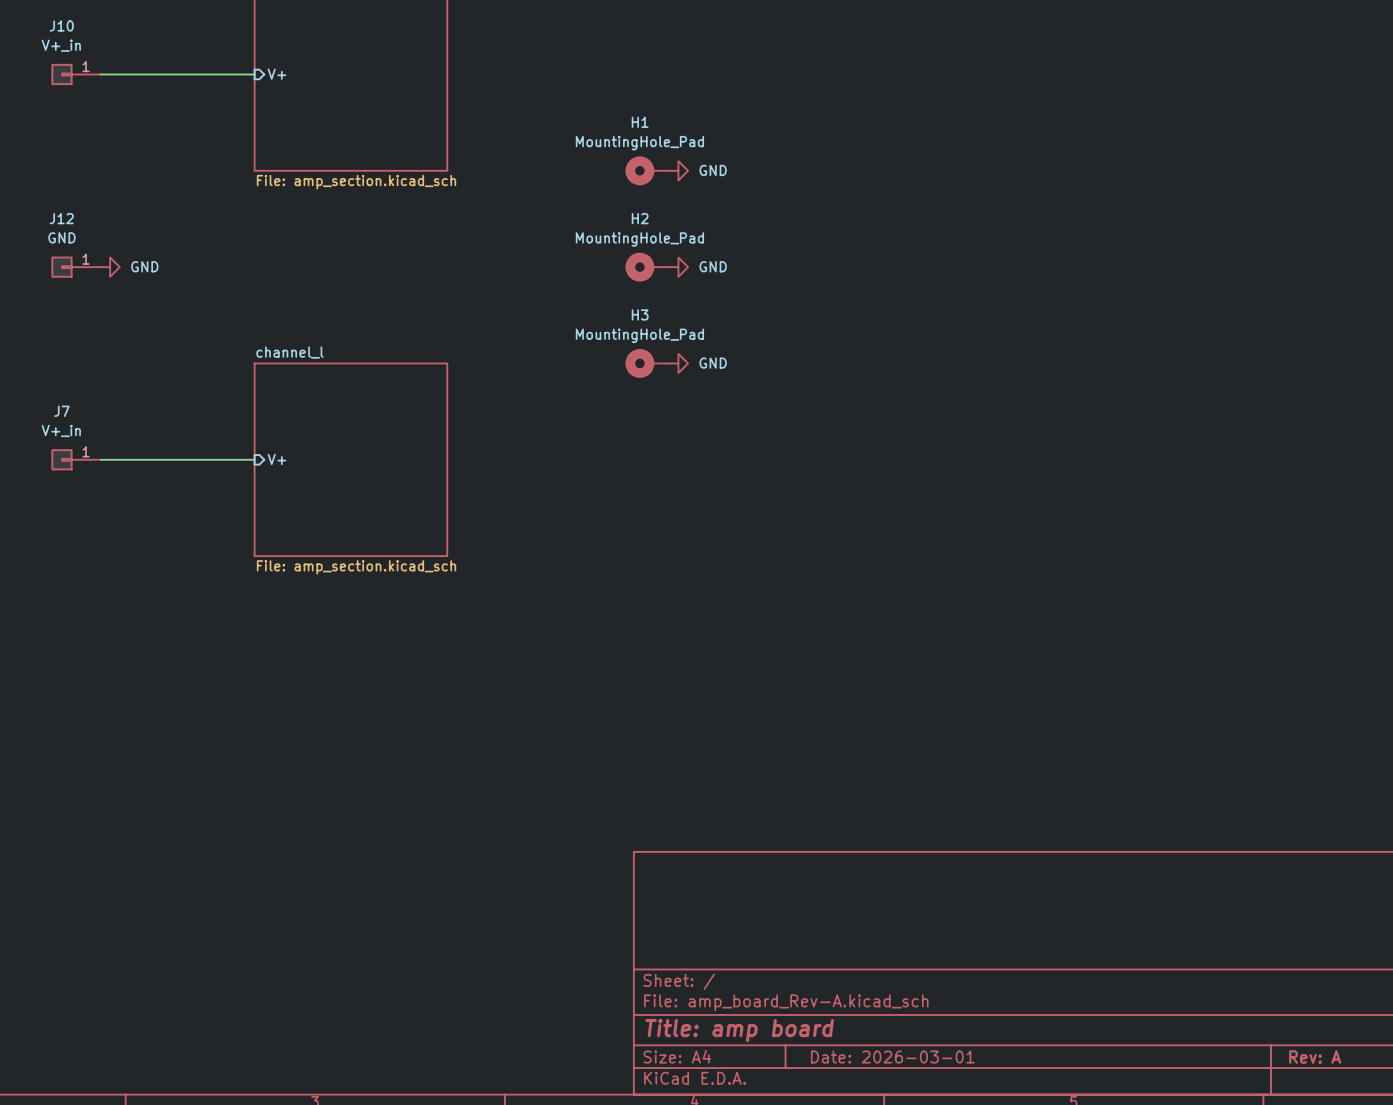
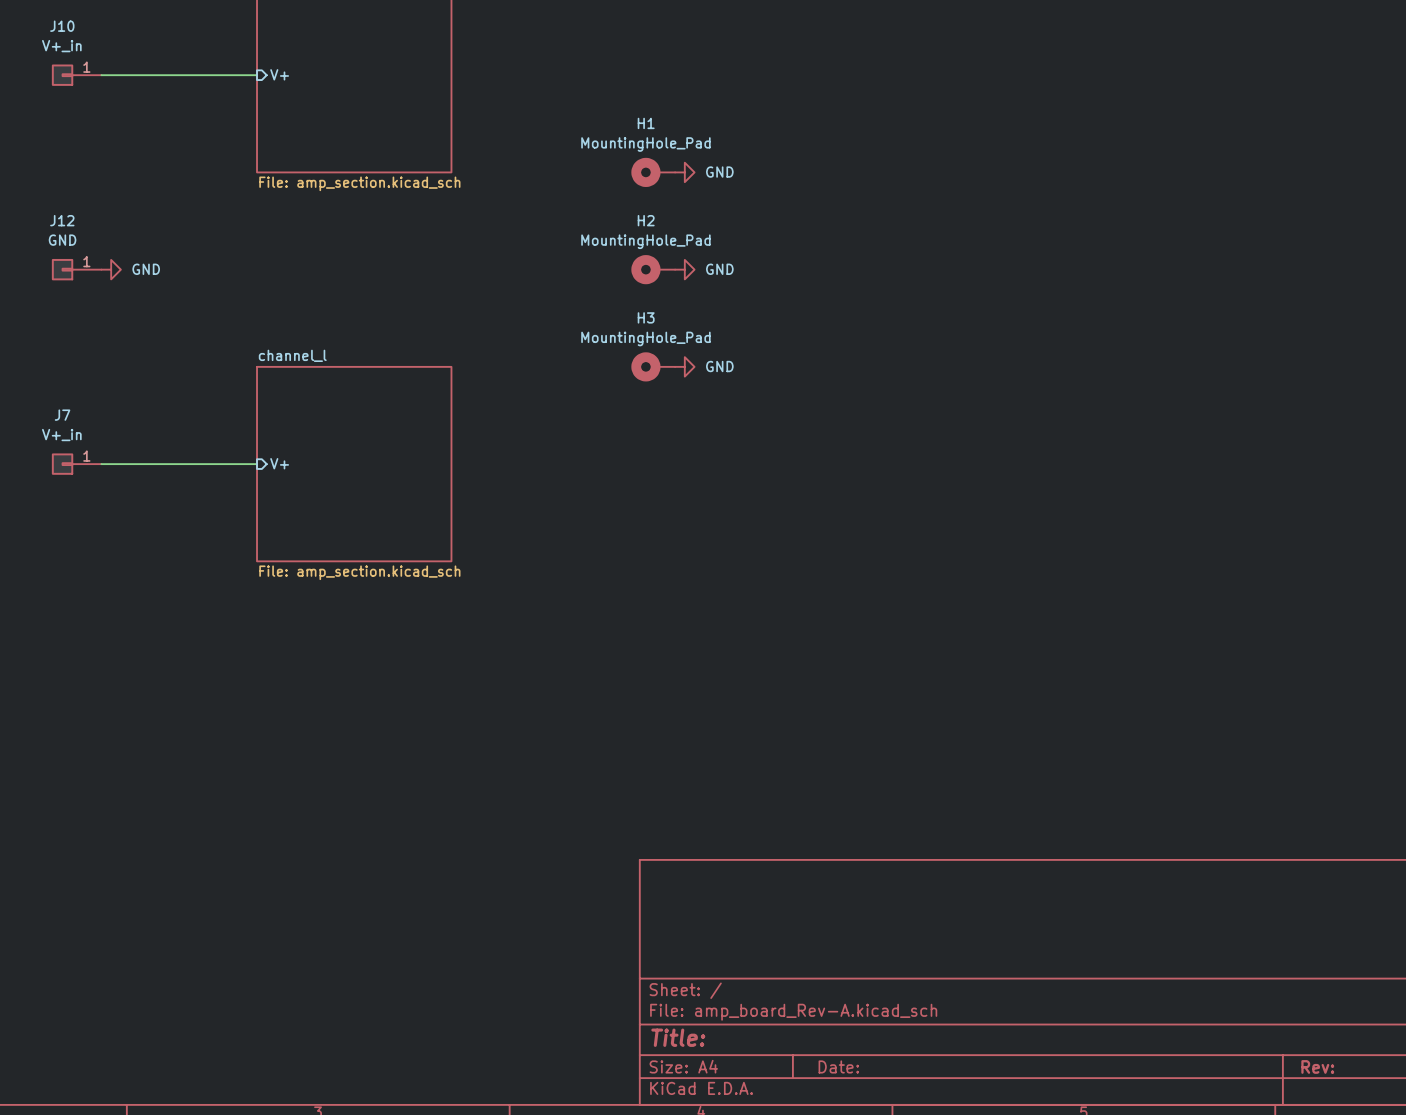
title block: Title: amp board (739, 1030) -> Title: (678, 1037)
title block: Date: 2026-03-01 (892, 1057) -> Date: (838, 1066)
title block: Rev: A (1315, 1057) -> Rev: (1317, 1066)

